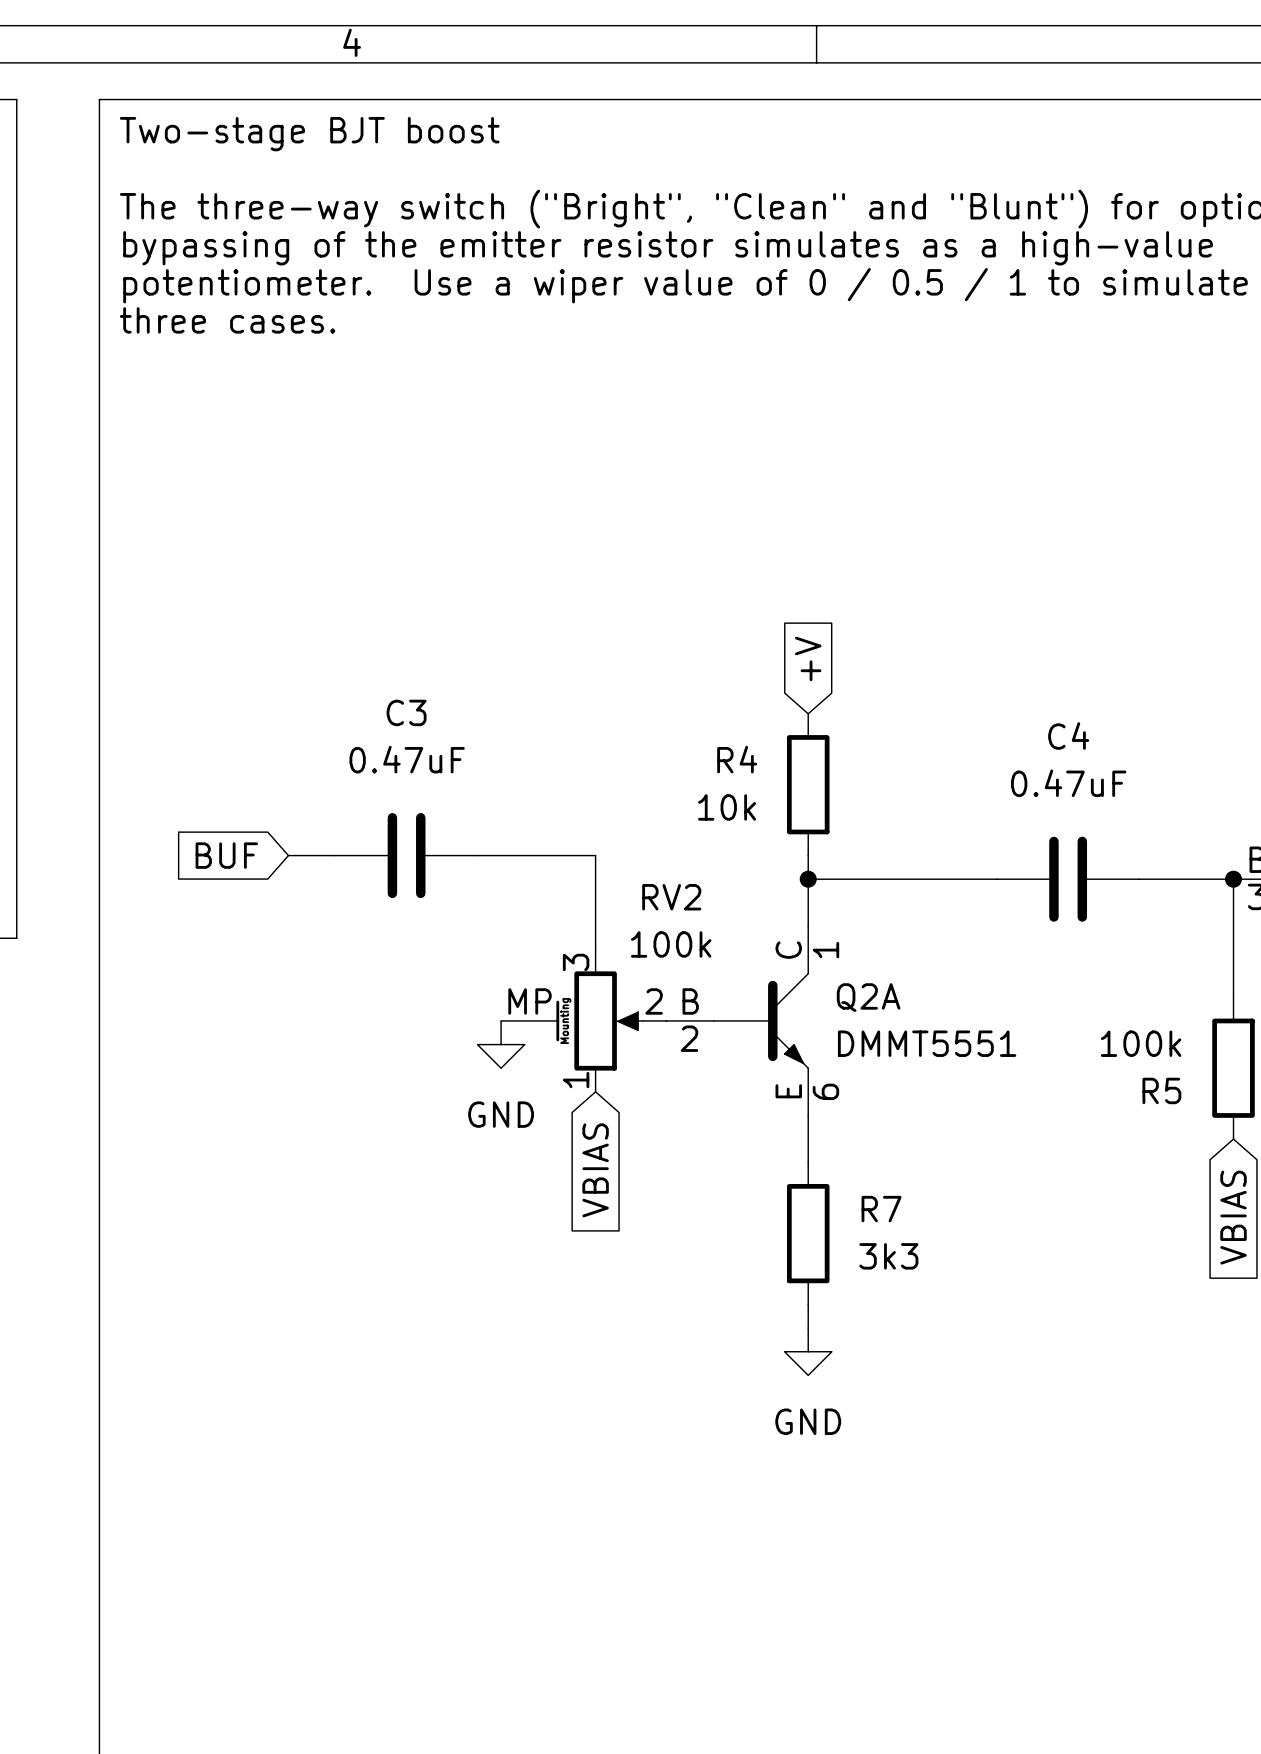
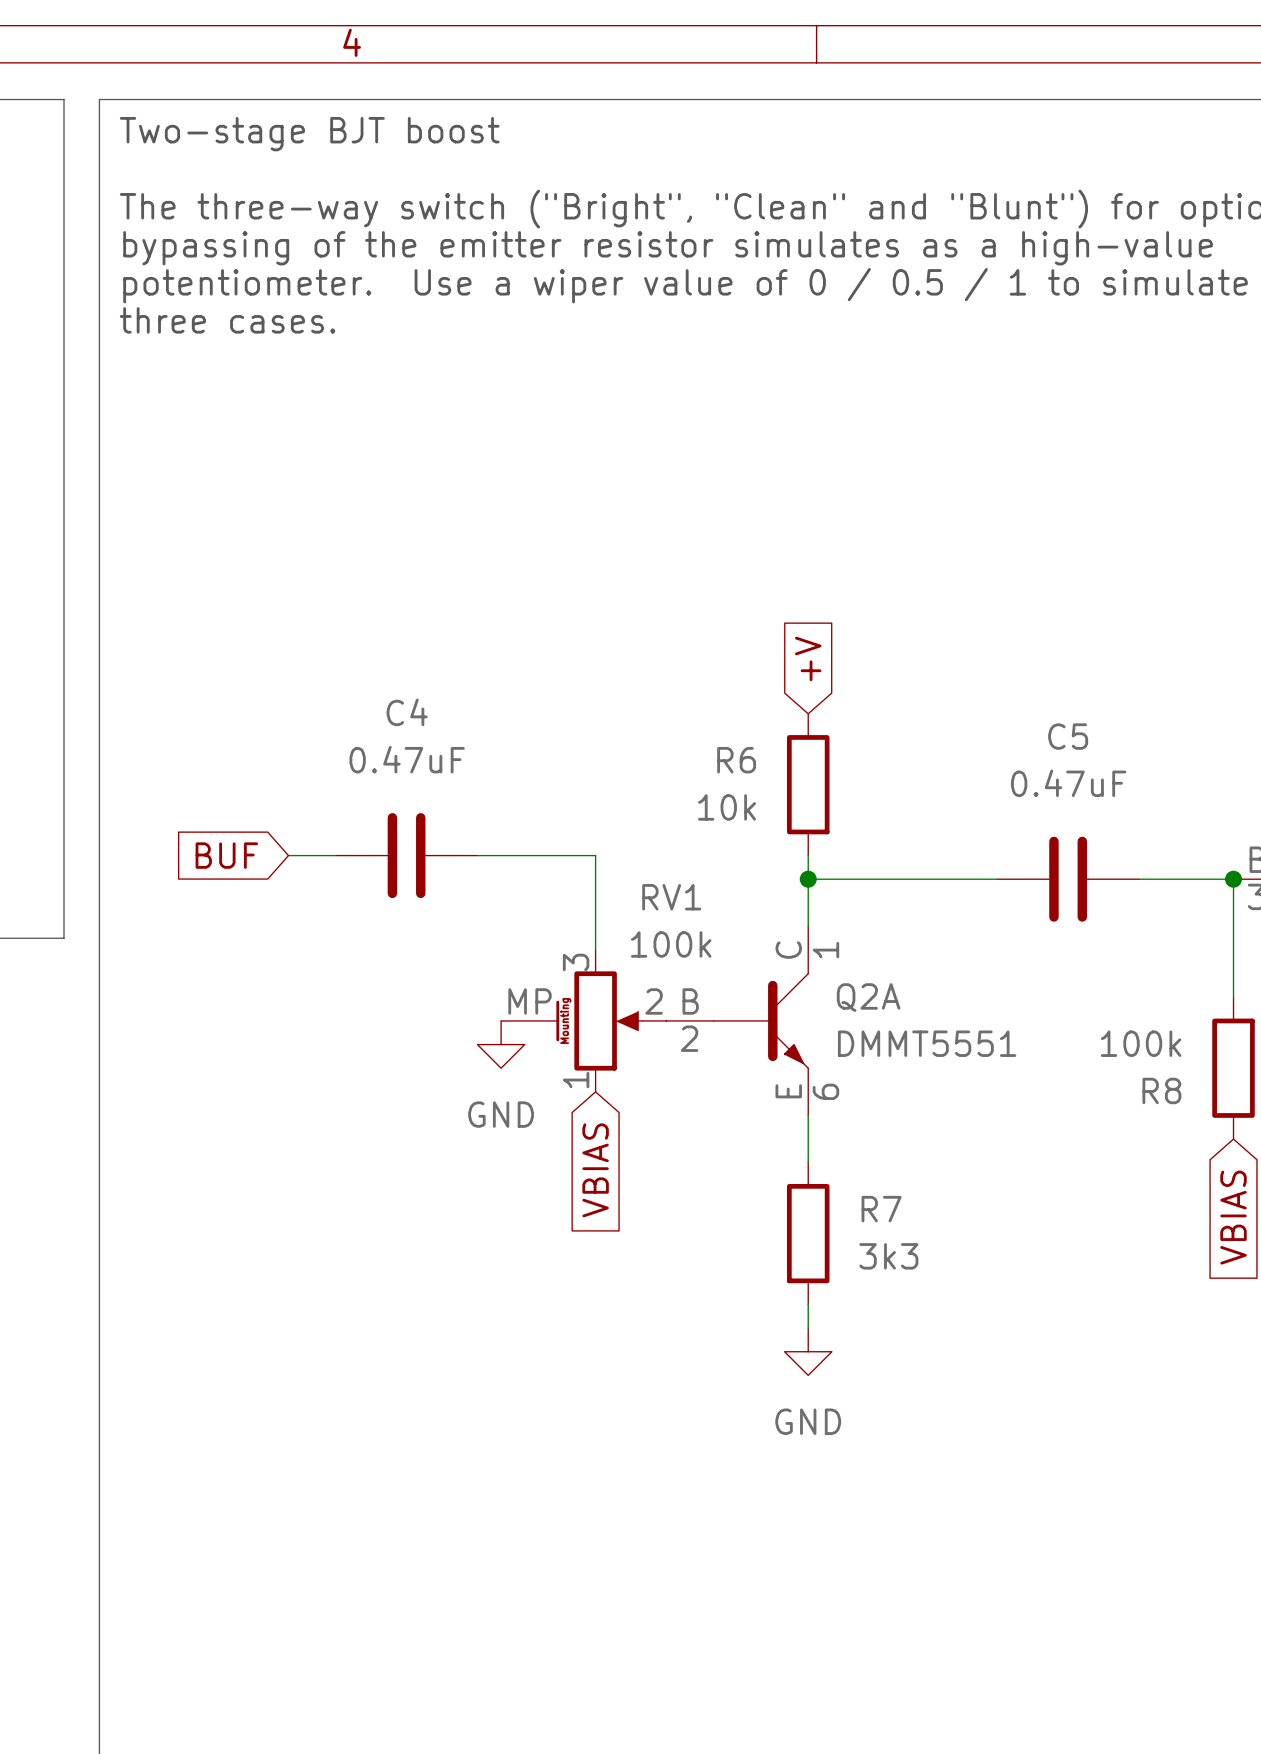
line: (16, 99) (16, 938) -> (16, 99) (63, 99) (63, 938) (16, 938)
C3 name: C3 (406, 712) -> C4 (407, 712)
C4 name: C4 (1068, 736) -> C5 (1068, 736)
R4 name: R4 (737, 759) -> R6 (736, 760)
RV2 name: RV2 (671, 897) -> RV1 (671, 897)
R5 name: R5 (1161, 1090) -> R8 (1161, 1090)

